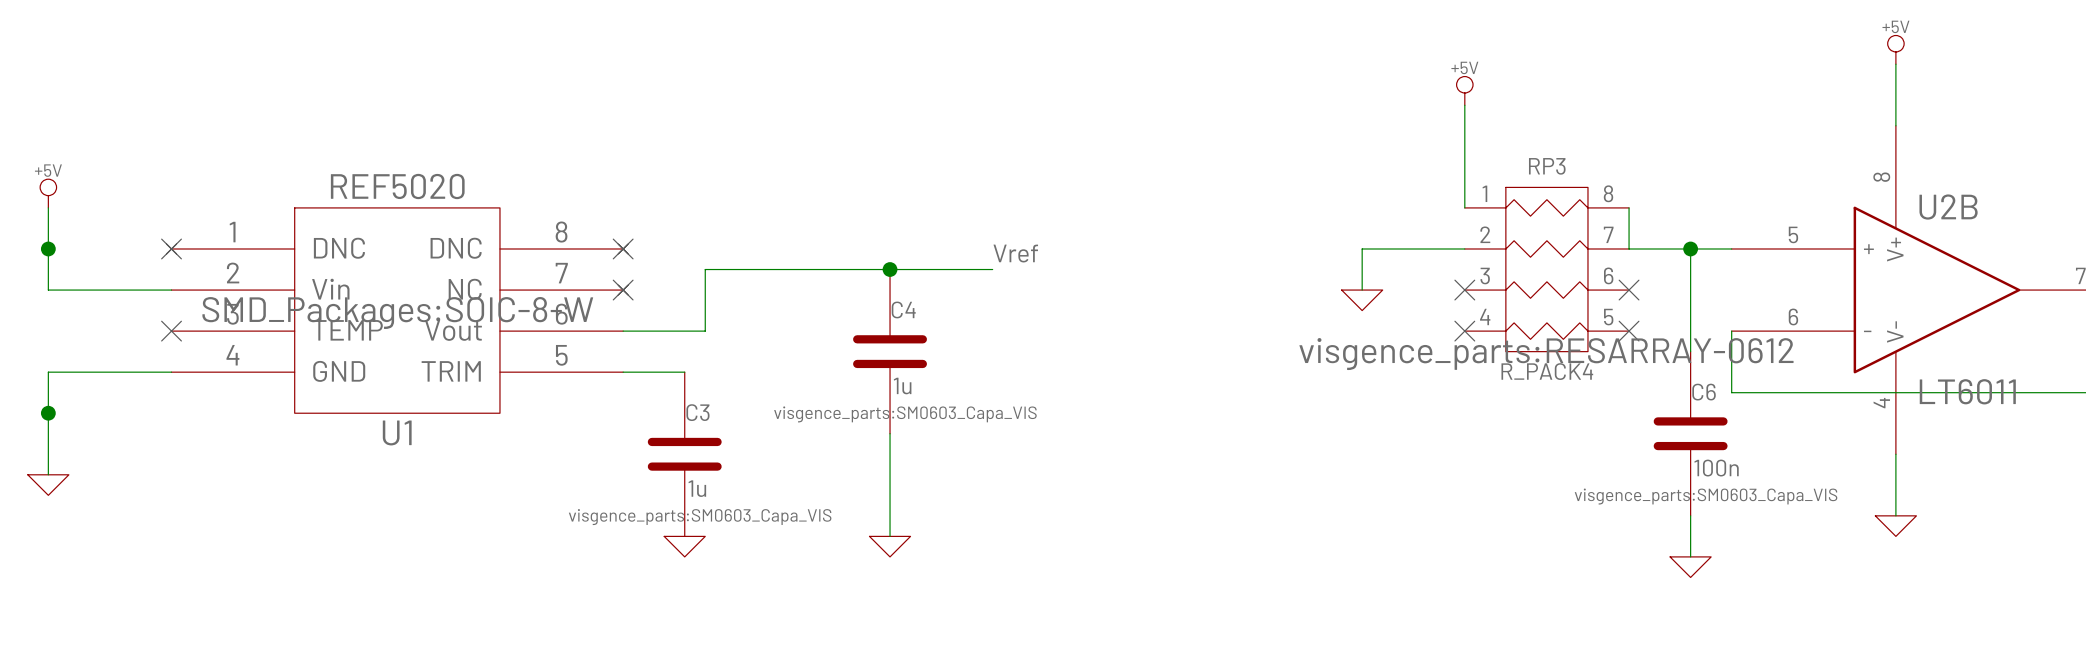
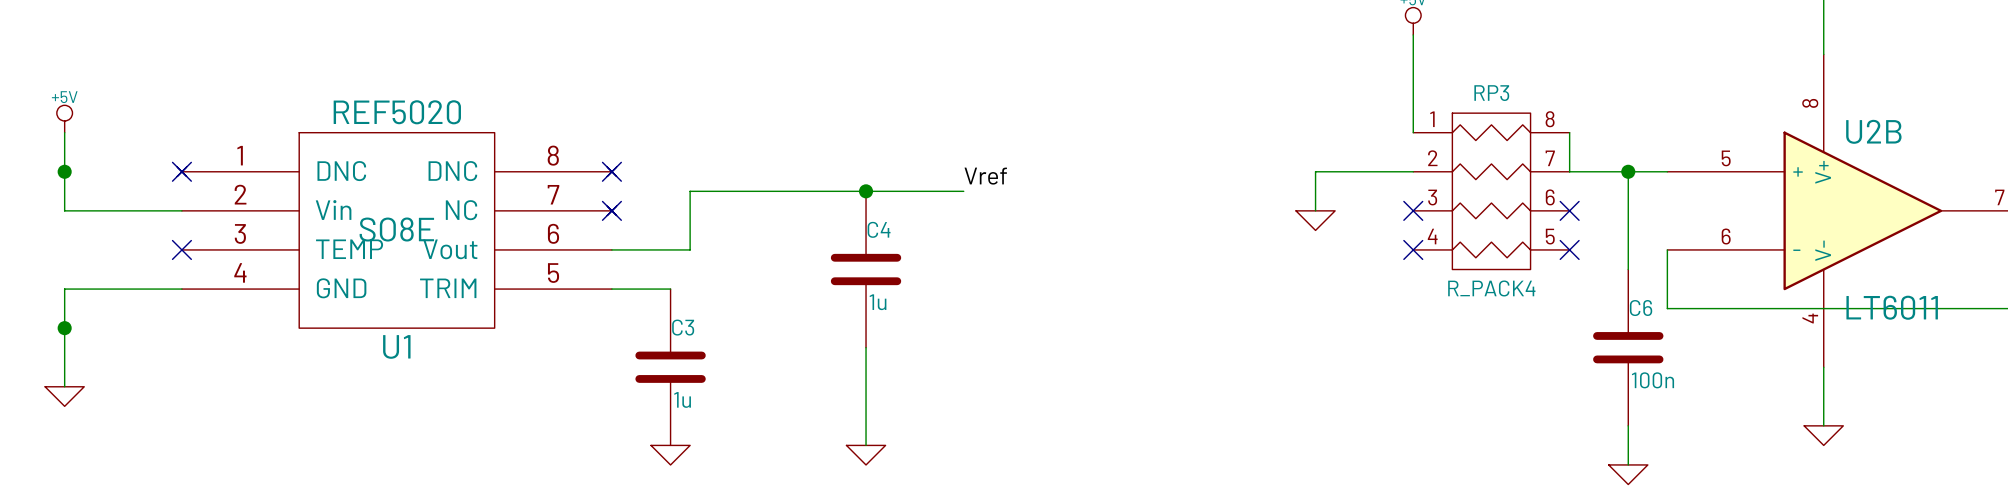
U1 text: SMD_Packages:SOIC-8-W (397, 312) -> SO8E (396, 229)
RP3 text: visgence_parts:RESARRAY-0612 (1546, 354) -> none
C4 text: visgence_parts:SM0603_Capa_VIS (905, 414) -> none
C6 text: visgence_parts:SM0603_Capa_VIS (1706, 496) -> none
C3 text: visgence_parts:SM0603_Capa_VIS (700, 517) -> none

